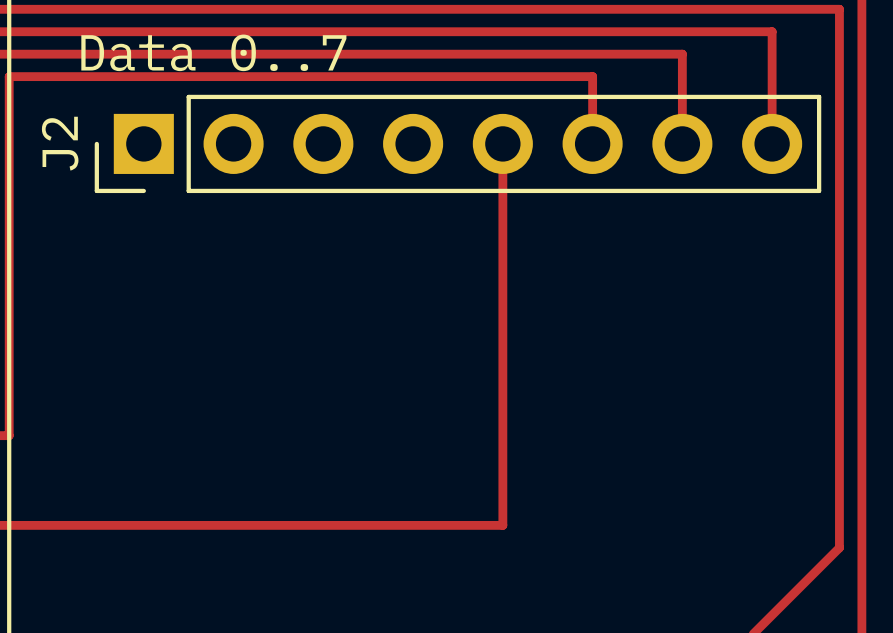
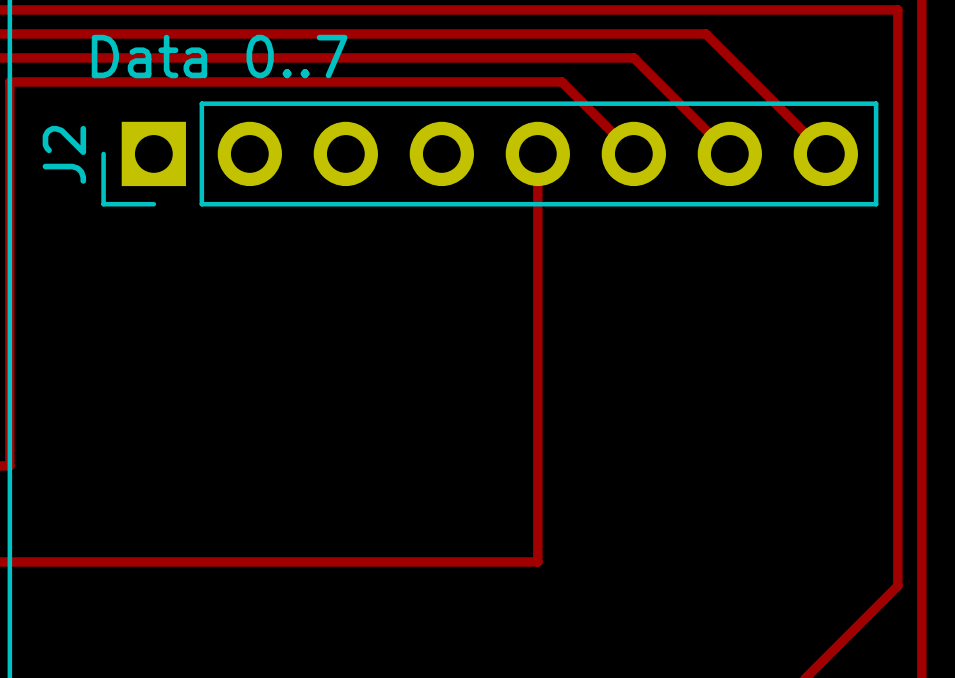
track: (659, 31) (772, 31) (772, 143) -> (705, 33) (825, 153)
track: (592, 54) (682, 54) (682, 143) -> (633, 57) (729, 153)
track: (525, 76) (592, 76) (592, 143) -> (561, 81) (633, 153)

